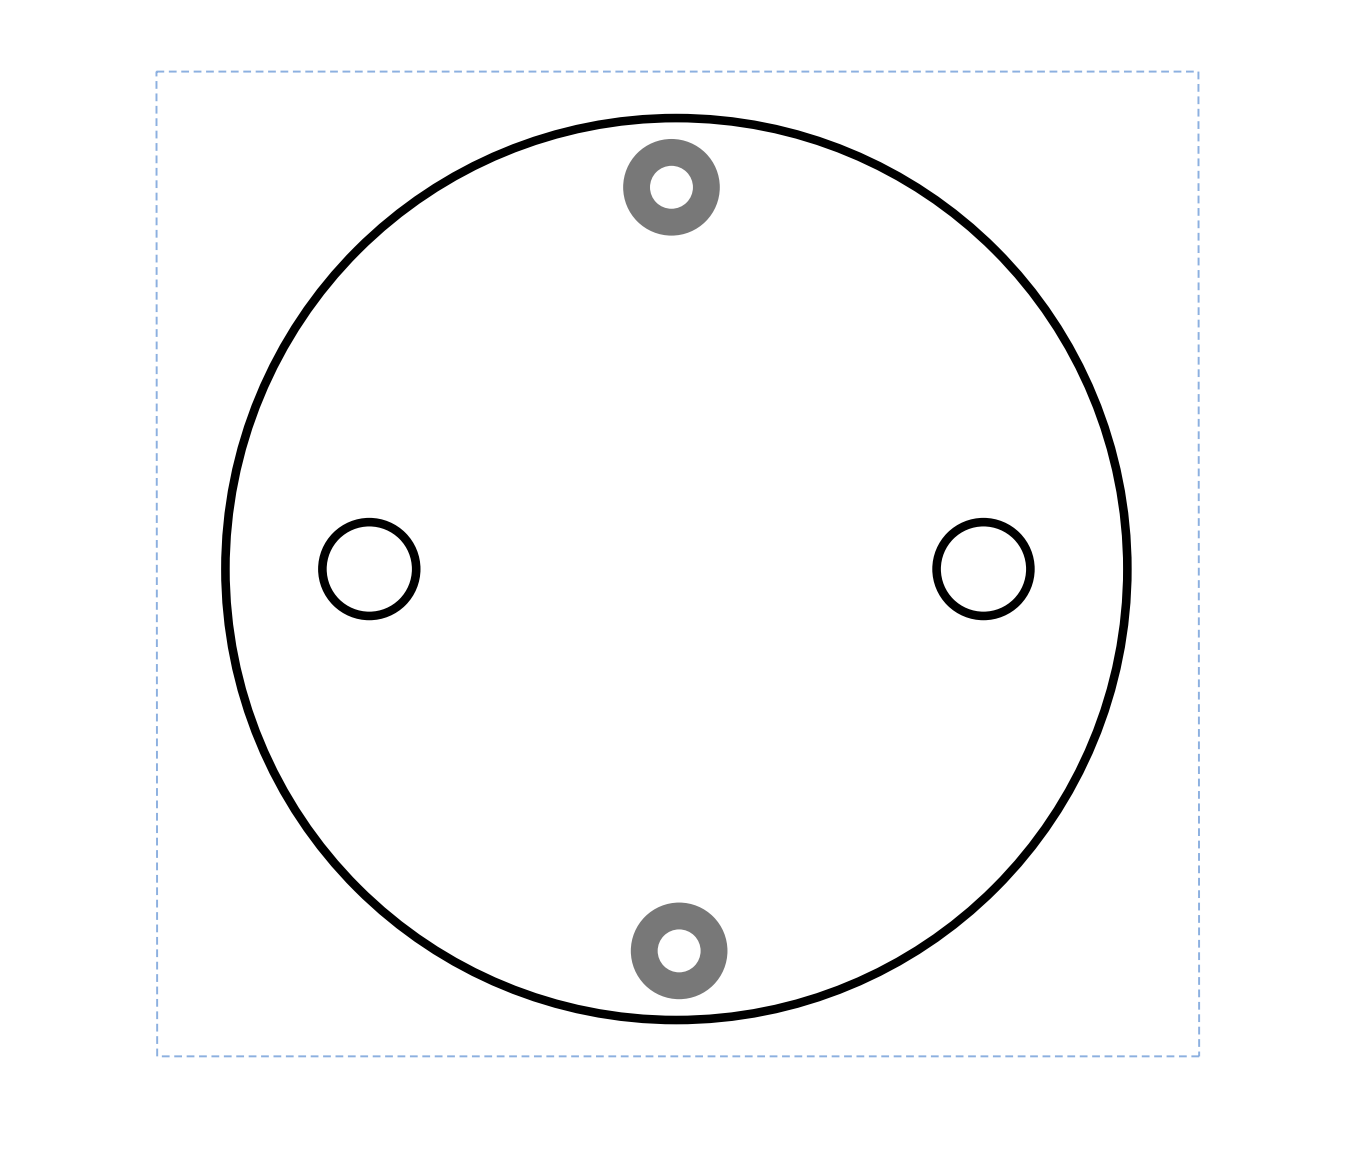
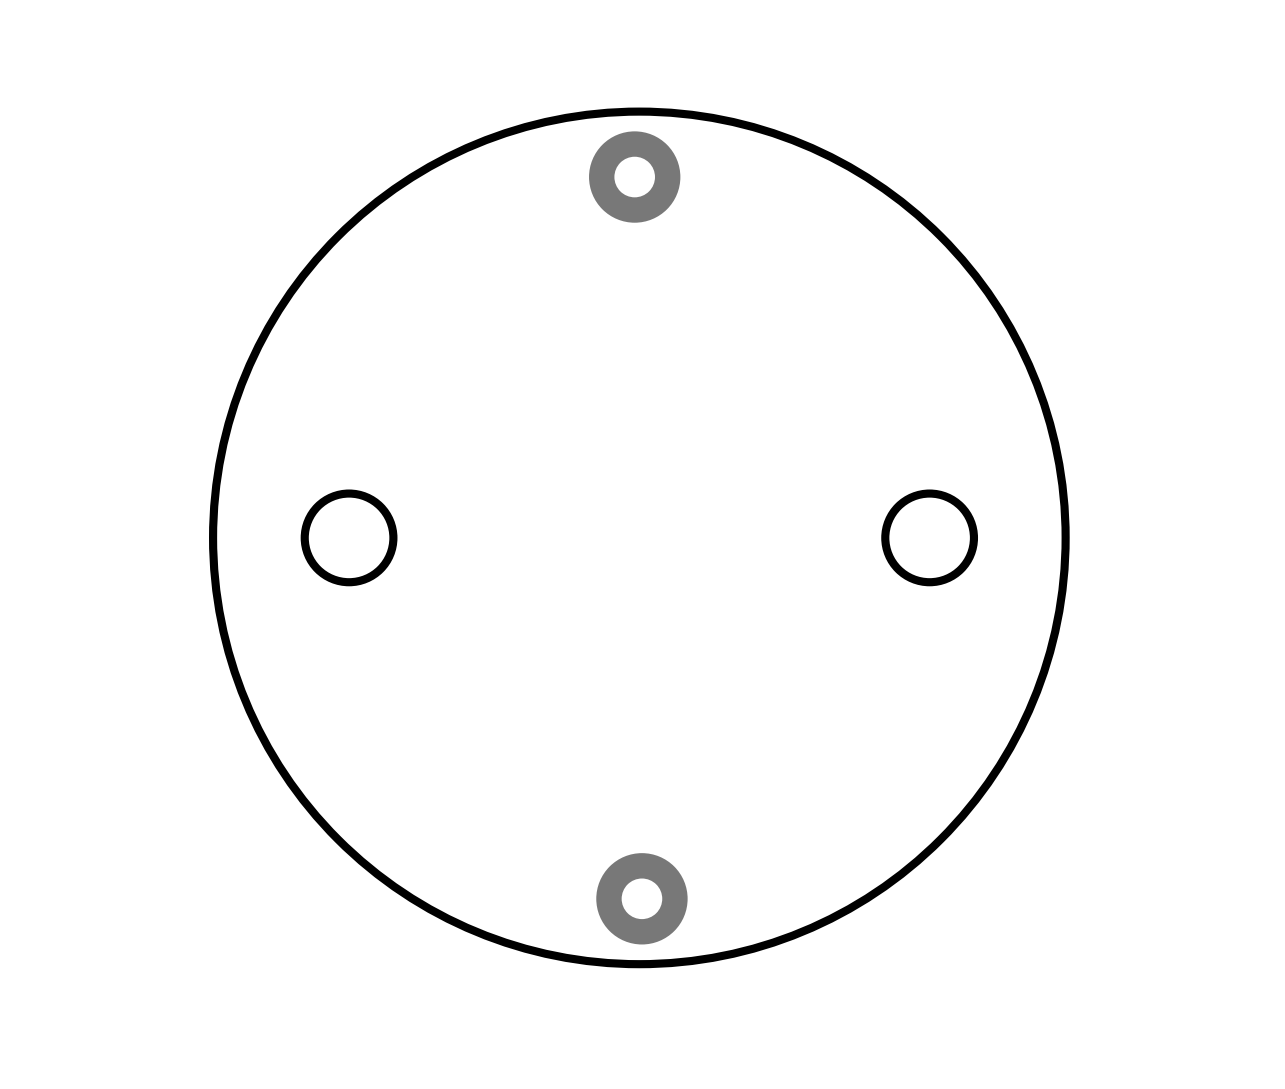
zone outline: (1198, 71) (156, 71) (157, 1056) (1199, 1056) (1198, 71) -> none

